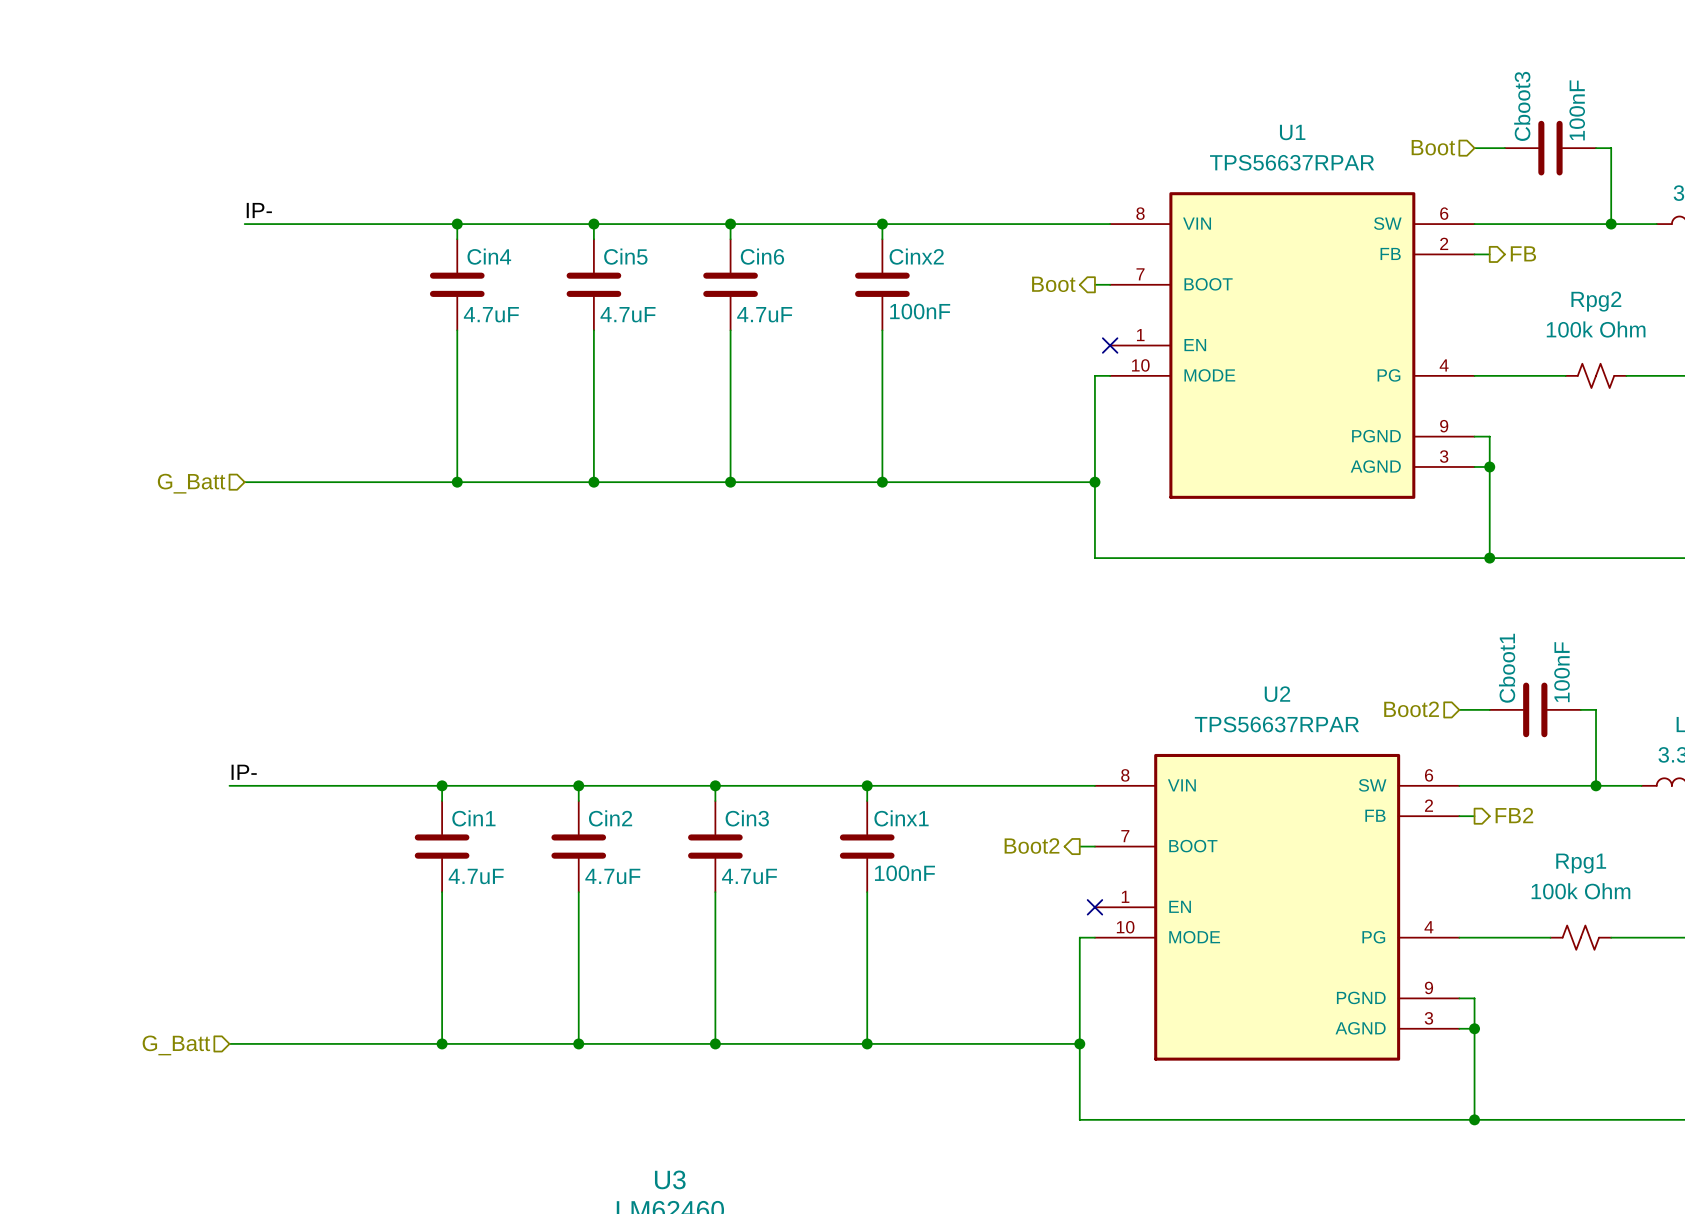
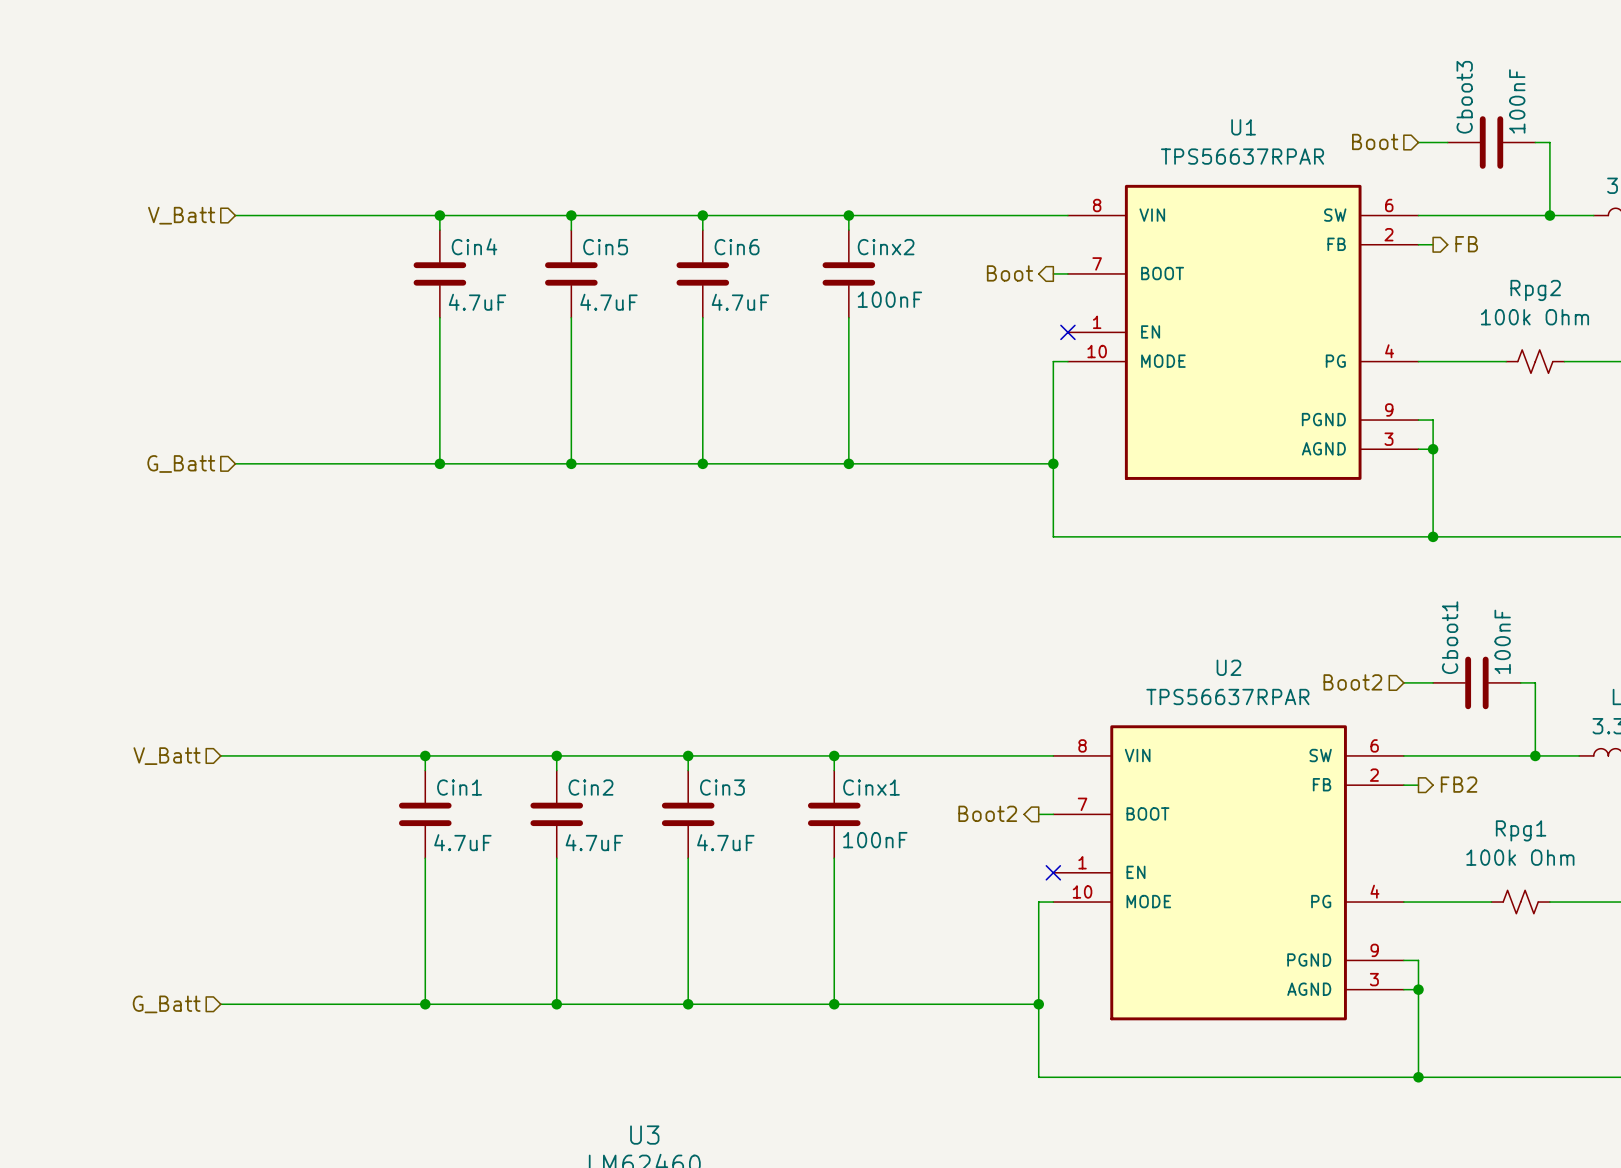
label: IP- (259, 210) -> none
hierarchical label: none -> V_Batt (181, 215)
label: IP- (244, 772) -> none
hierarchical label: none -> V_Batt (167, 756)

